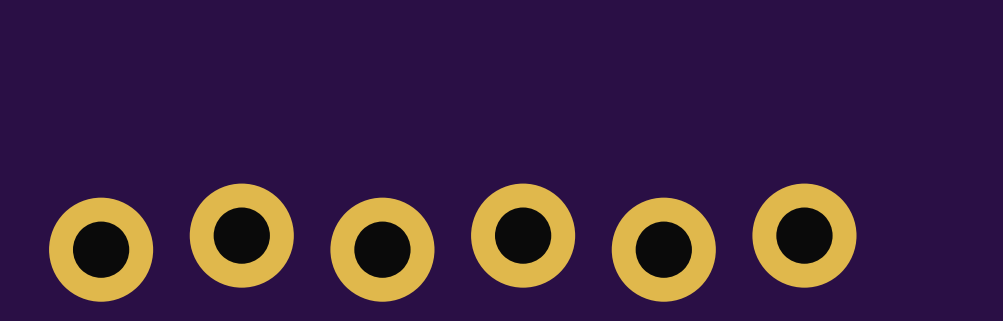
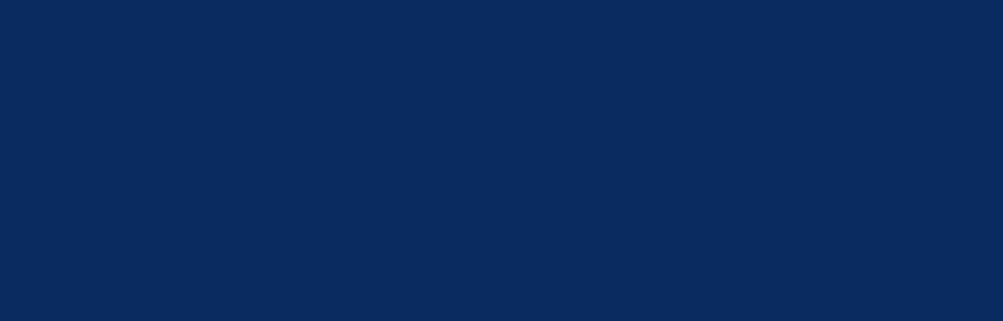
part: (452, 242) -> none

